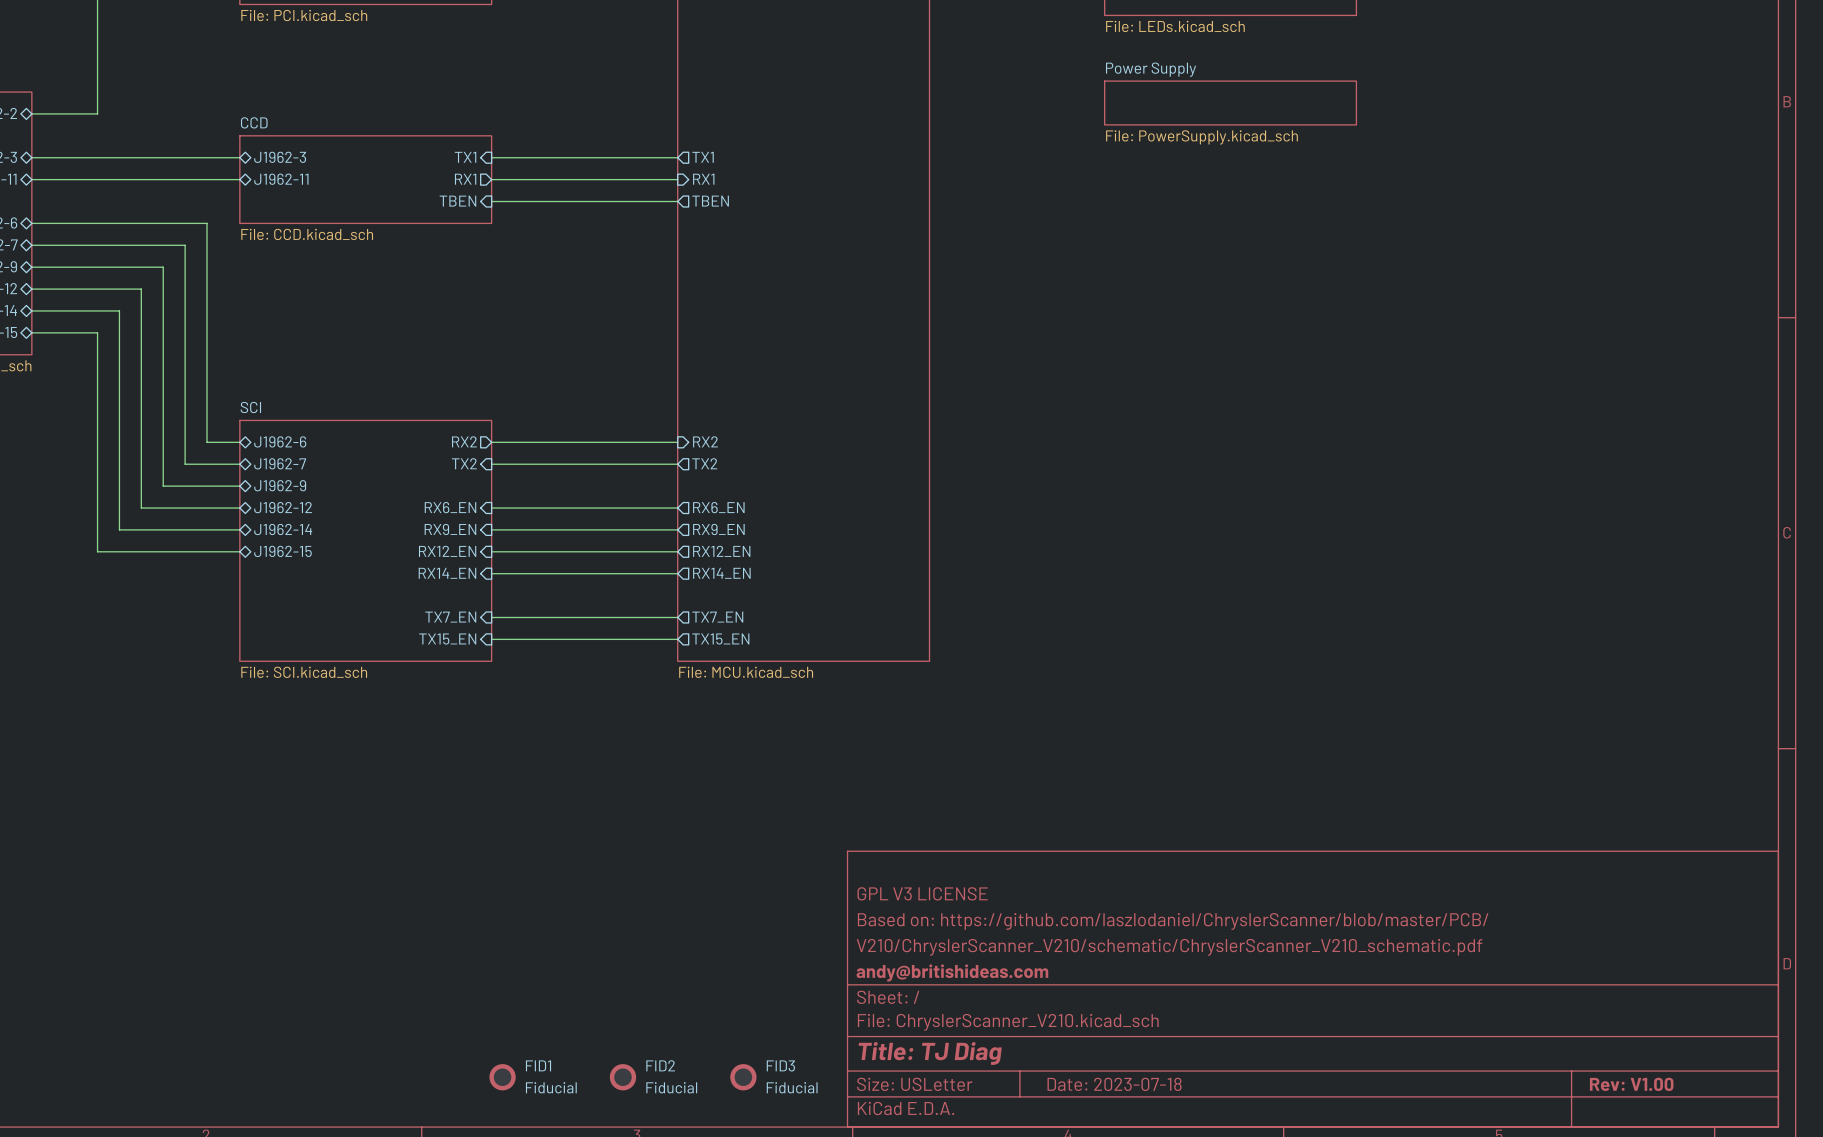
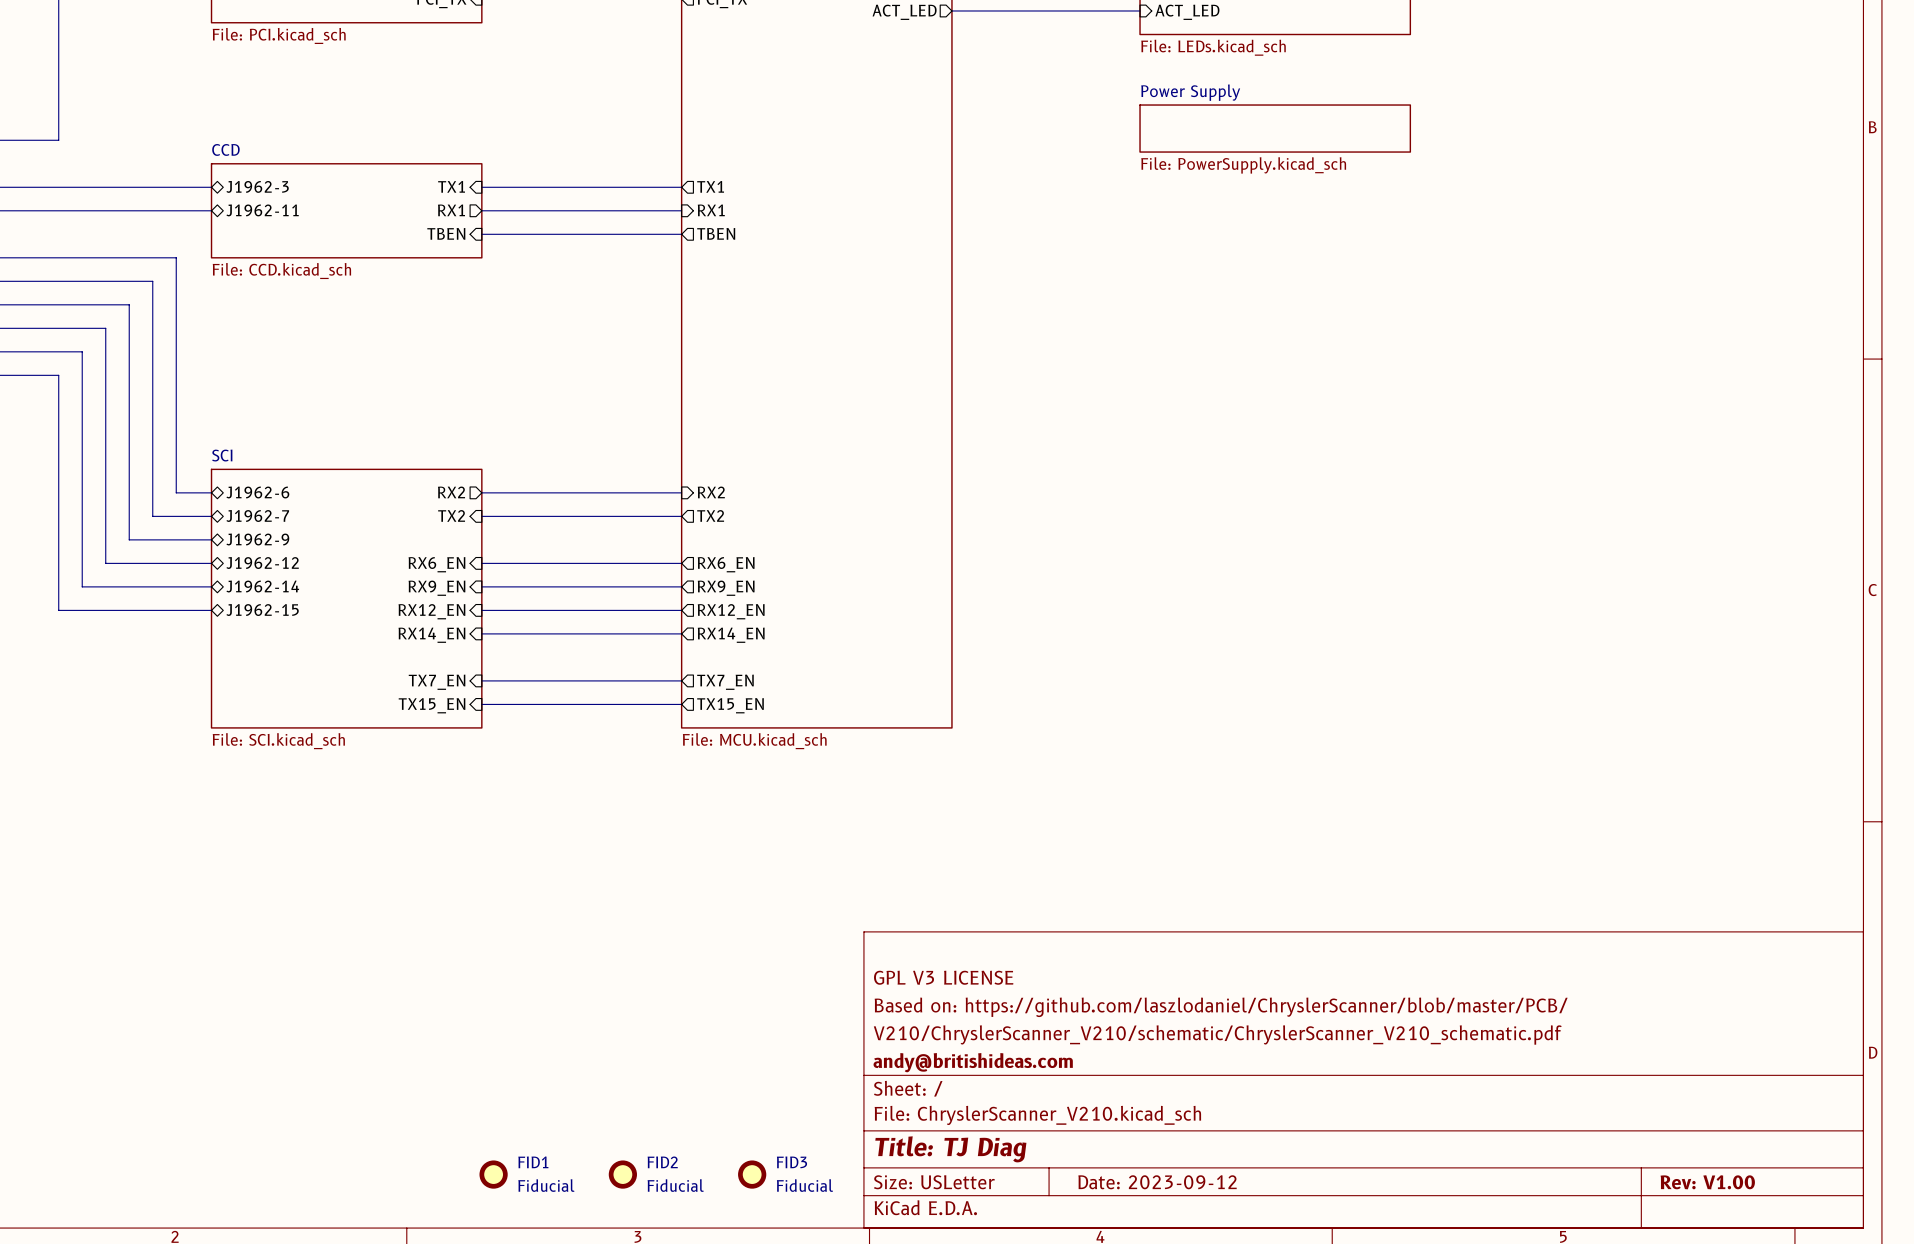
title block: Date: 2023-07-18 (1114, 1084) -> Date: 2023-09-12 (1157, 1182)

